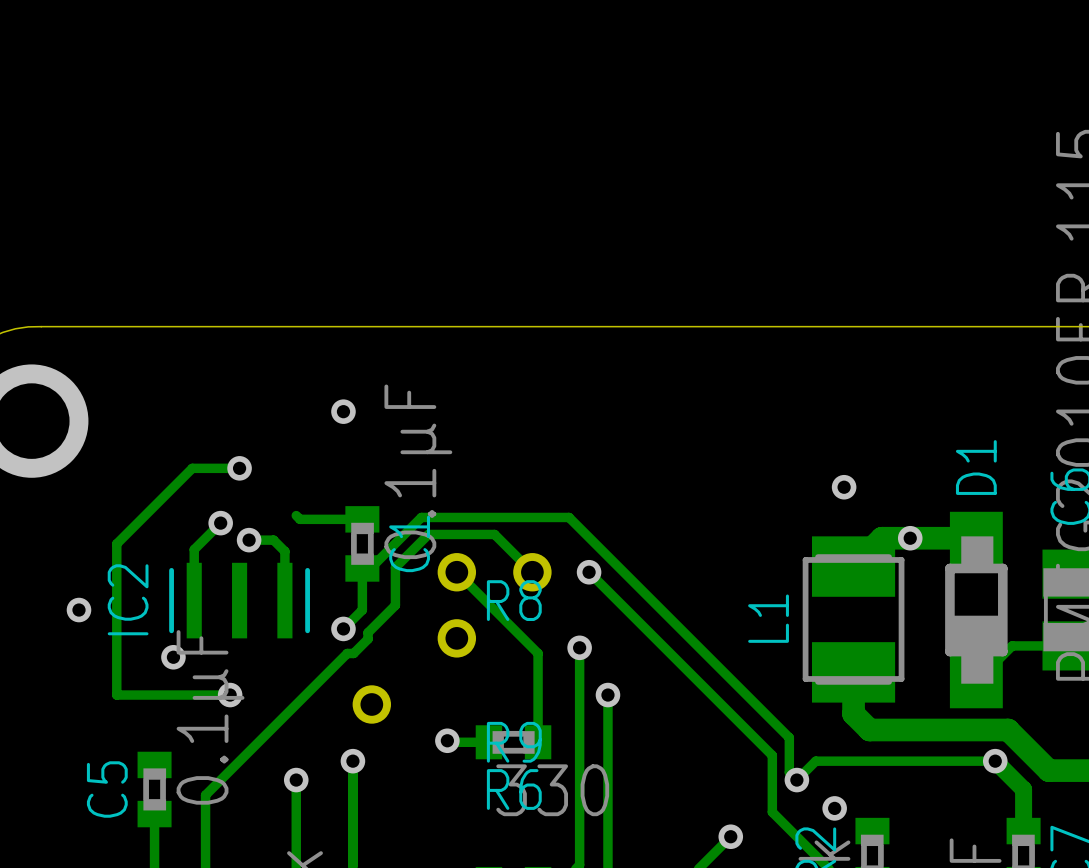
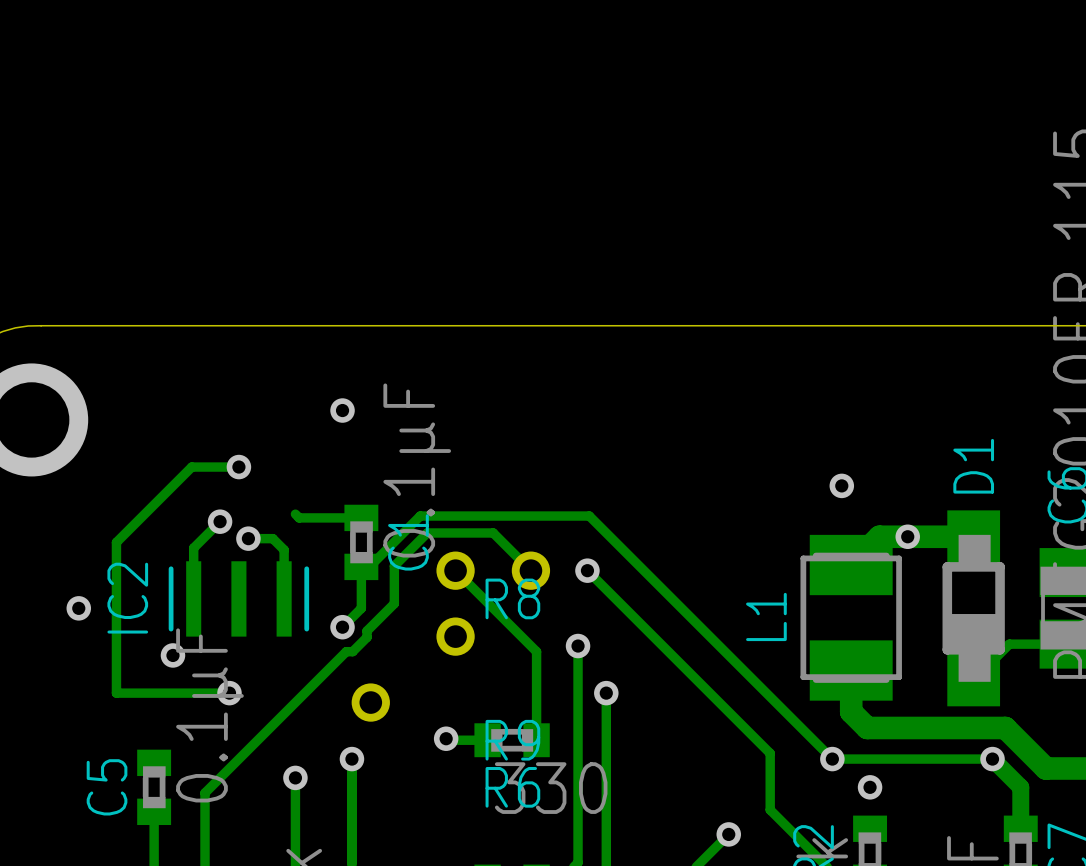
track: (569, 517) (789, 737) (789, 772) (796, 780) (815, 761) (834, 761) -> (567, 516) (589, 516) (832, 759)
via: none -> (832, 759)
via: (796, 780) -> none
via: none -> (870, 787)
via: (834, 808) -> none

